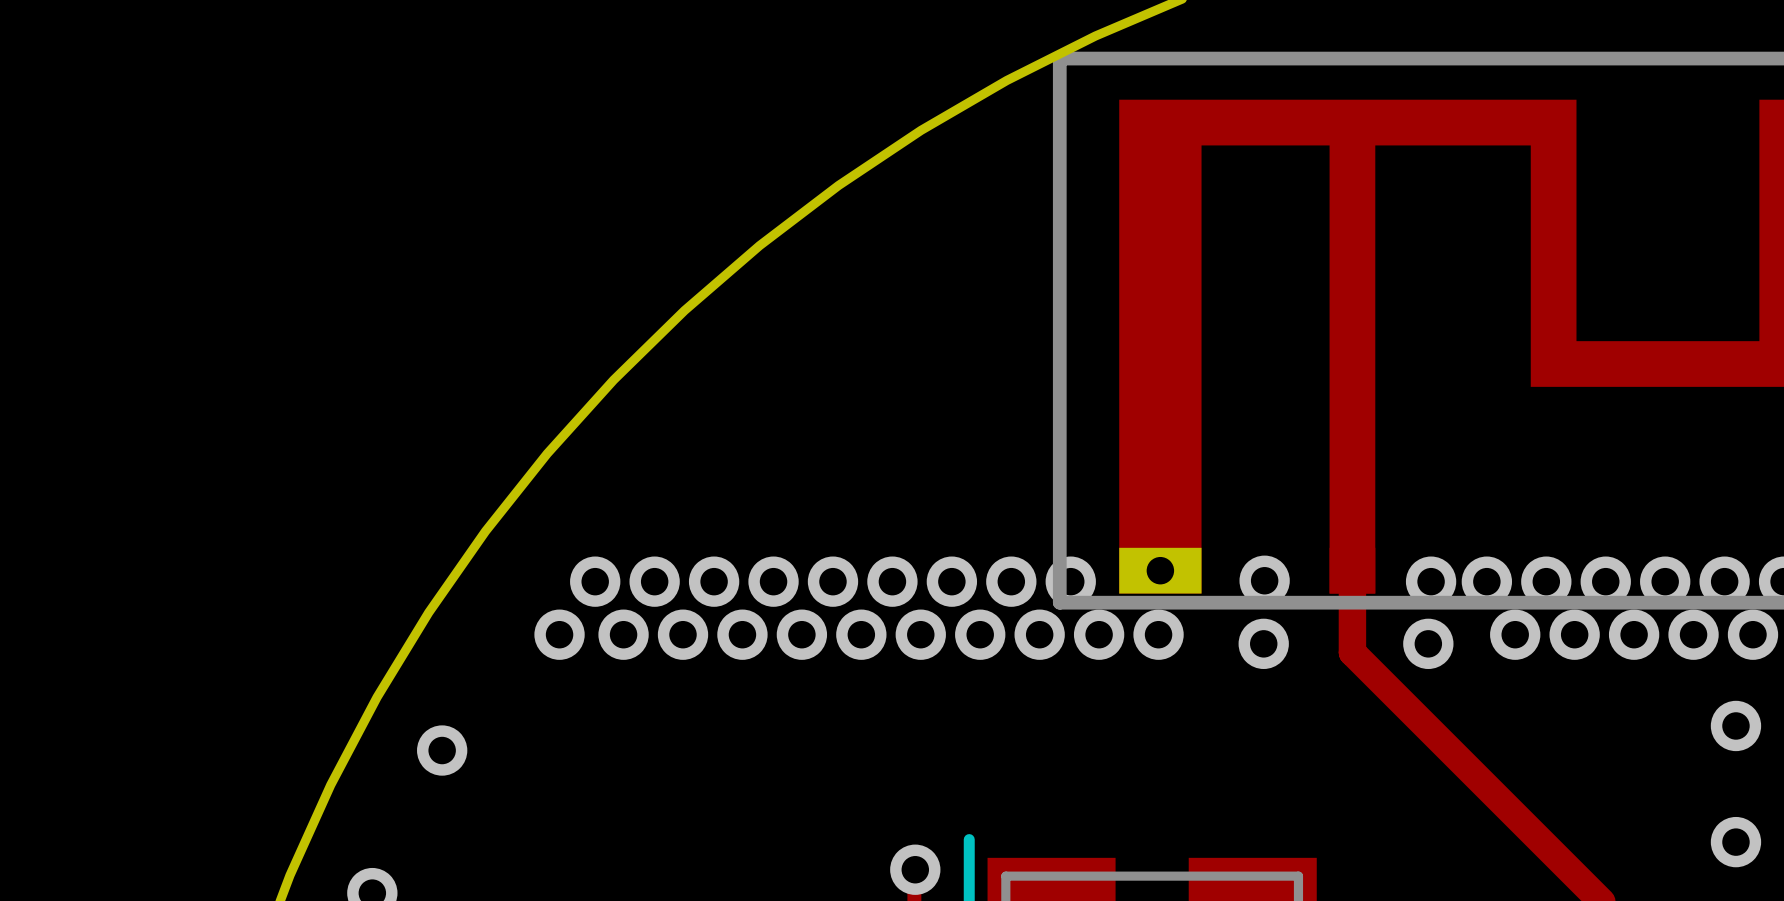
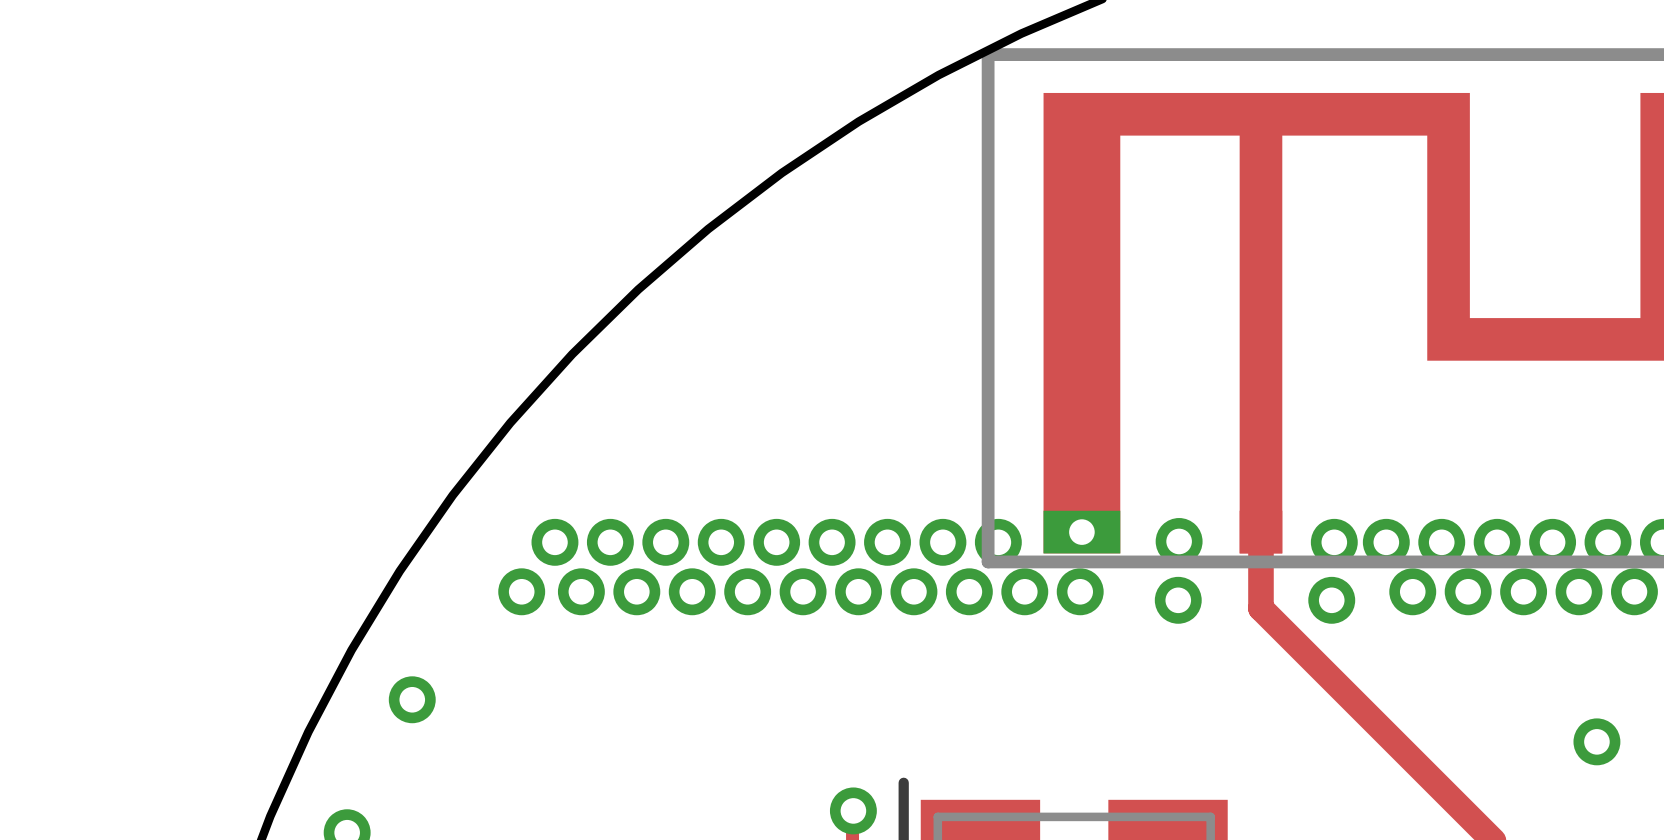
via: (1735, 725) -> none
via position: (1735, 842) -> (1596, 741)

